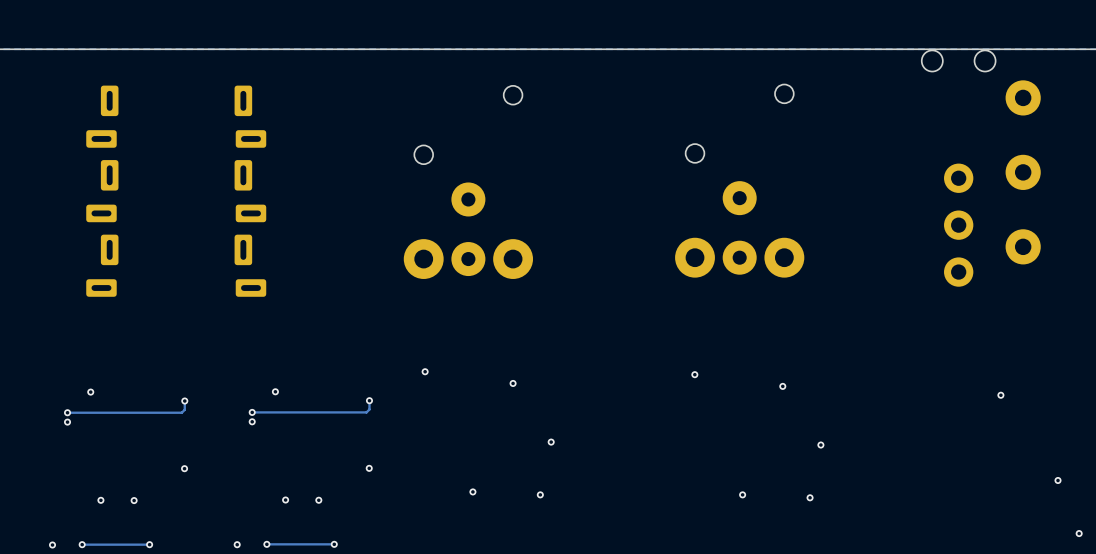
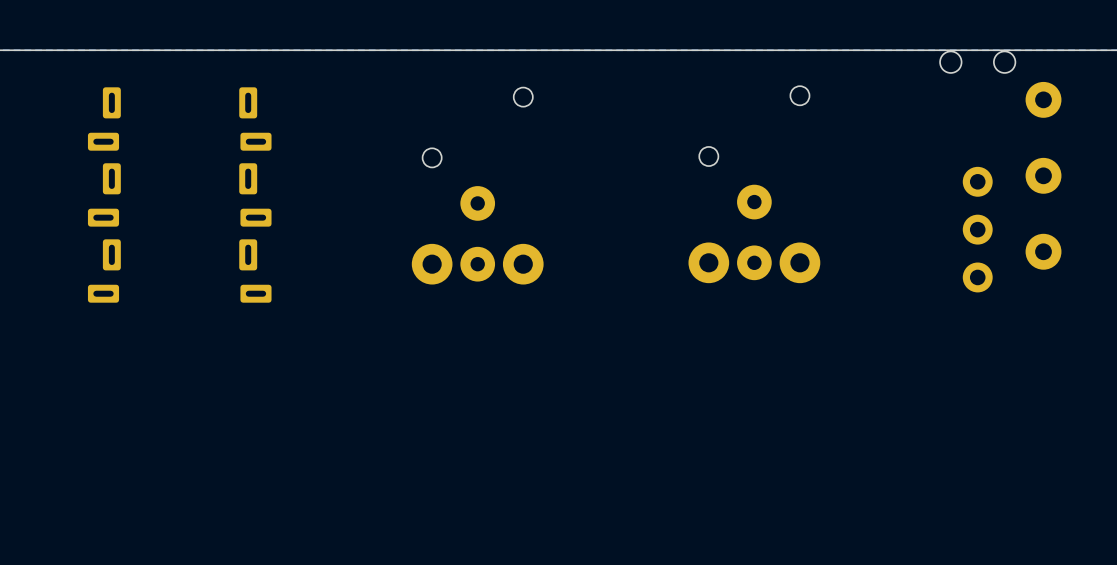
via: (425, 371) -> none
via: (694, 374) -> none
via: (513, 383) -> none
via: (782, 386) -> none
via: (275, 391) -> none
via: (90, 392) -> none
via: (1000, 395) -> none
track: (369, 400) (369, 409) (366, 412) (252, 412) -> none
via: (369, 400) -> none
track: (184, 401) (184, 409) (181, 412) (67, 412) -> none
via: (184, 401) -> none
via: (67, 412) -> none
via: (252, 412) -> none
via: (252, 421) -> none
via: (67, 422) -> none
via: (551, 442) -> none
via: (820, 445) -> none
via: (184, 468) -> none
via: (369, 468) -> none
via: (1058, 480) -> none
via: (472, 491) -> none
via: (540, 494) -> none
via: (742, 494) -> none
via: (810, 497) -> none
via: (100, 500) -> none
via: (134, 500) -> none
via: (285, 500) -> none
via: (318, 500) -> none
via: (1079, 533) -> none
via: (82, 544) -> none
track: (149, 544) (82, 544) -> none
via: (149, 544) -> none
via: (237, 544) -> none
via: (266, 544) -> none
track: (334, 544) (266, 544) -> none
via: (334, 544) -> none
via: (52, 545) -> none

